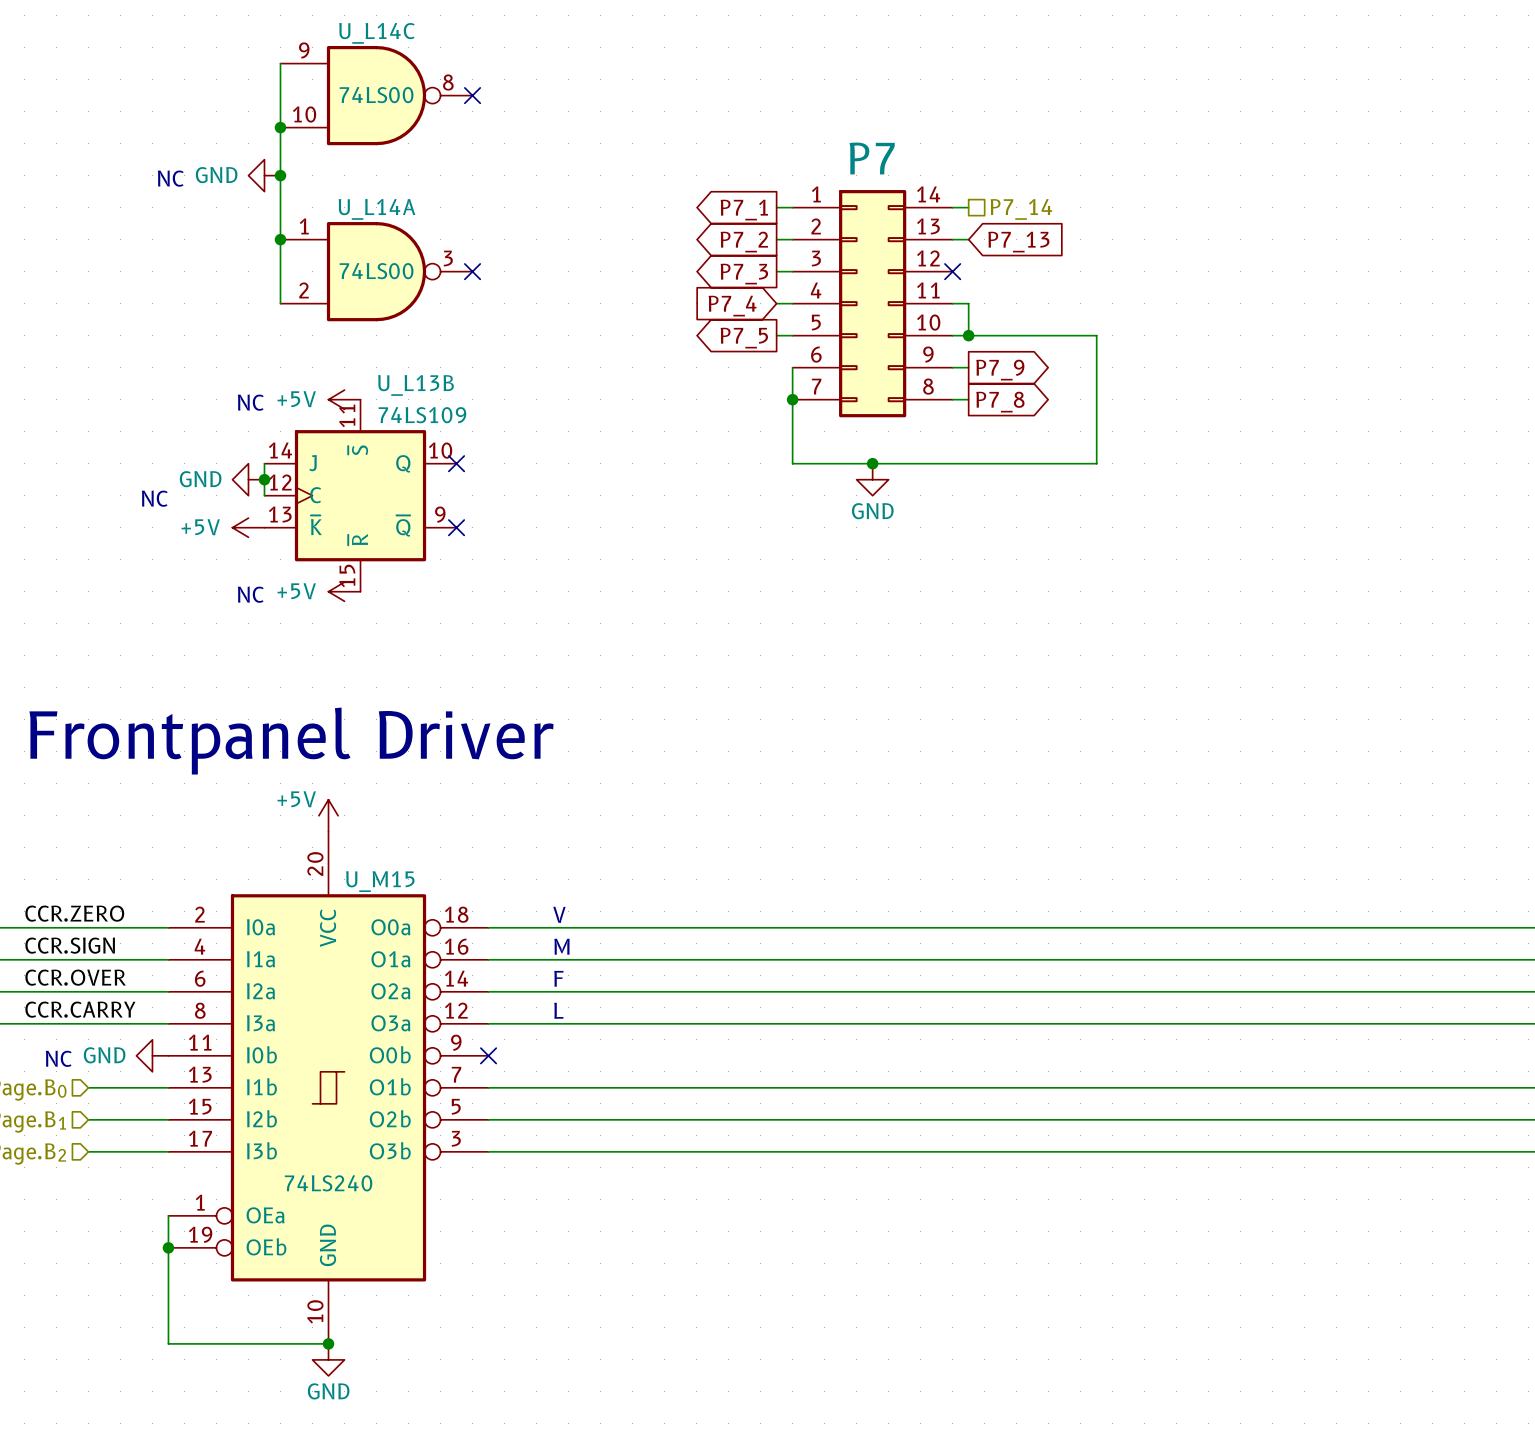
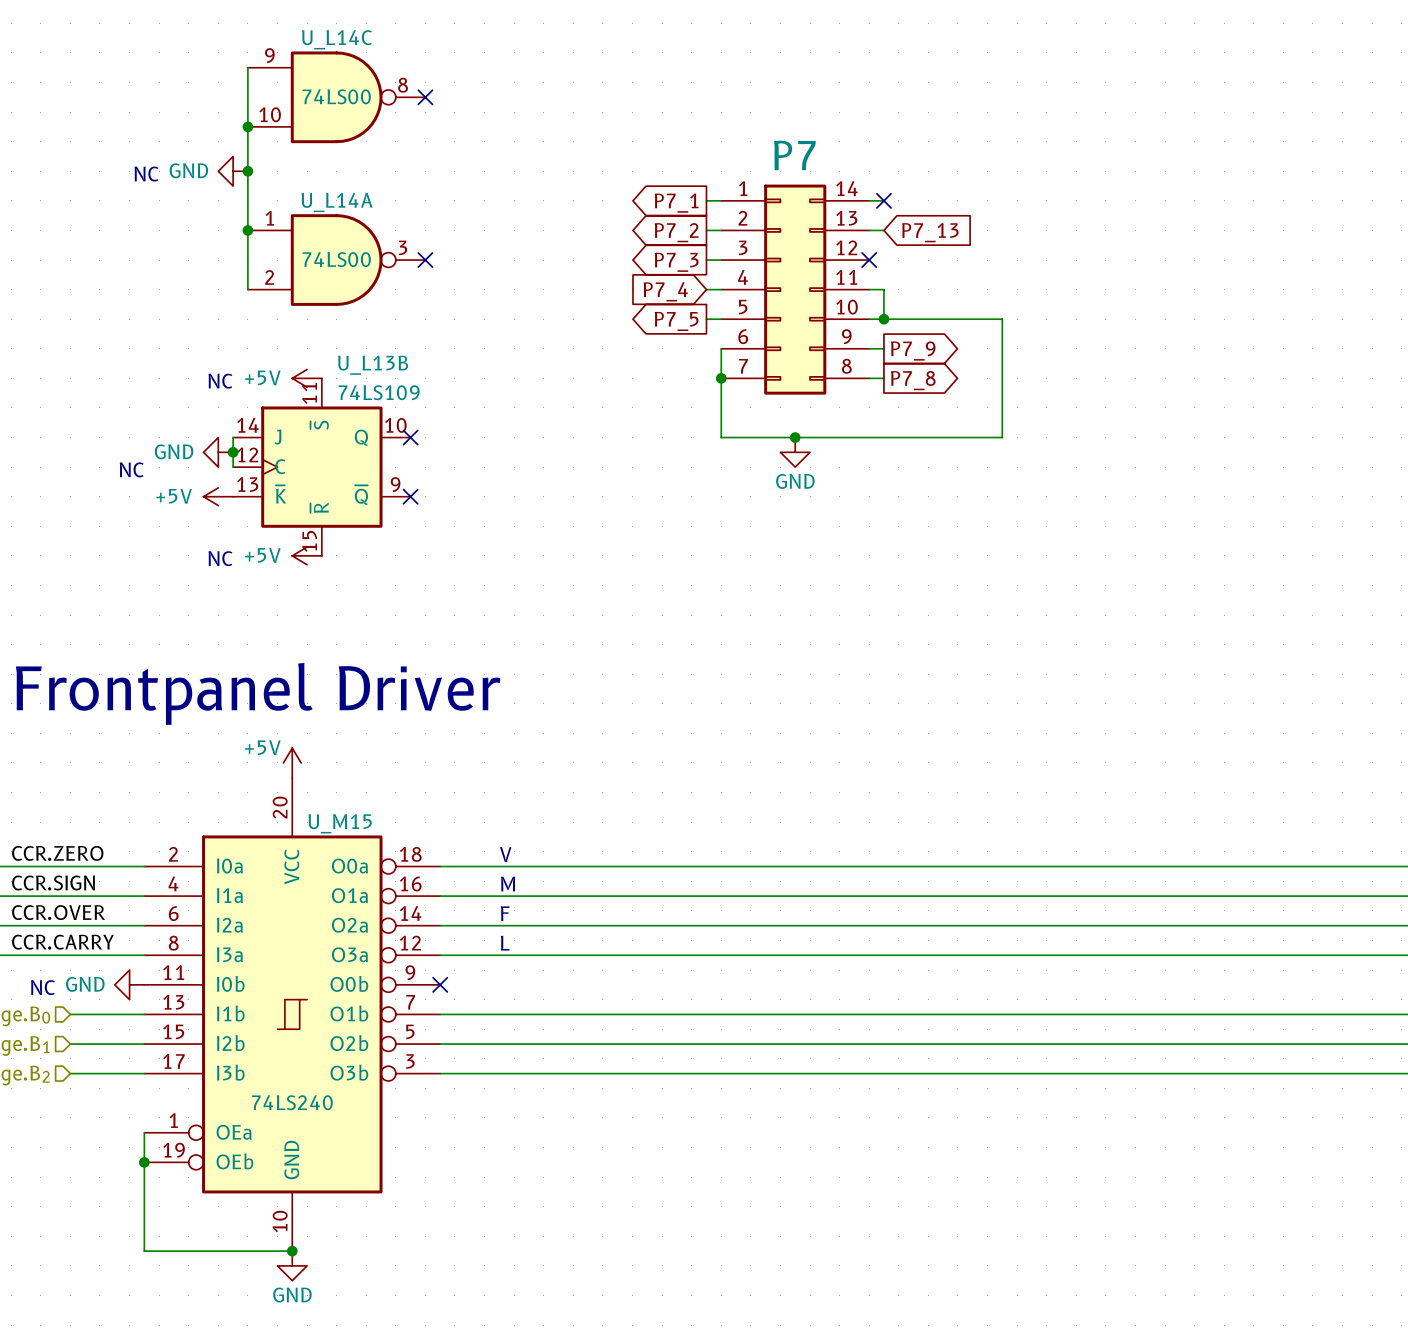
no-connect mark: none -> (883, 200)
hierarchical label: P7_14 (1021, 209) -> none

